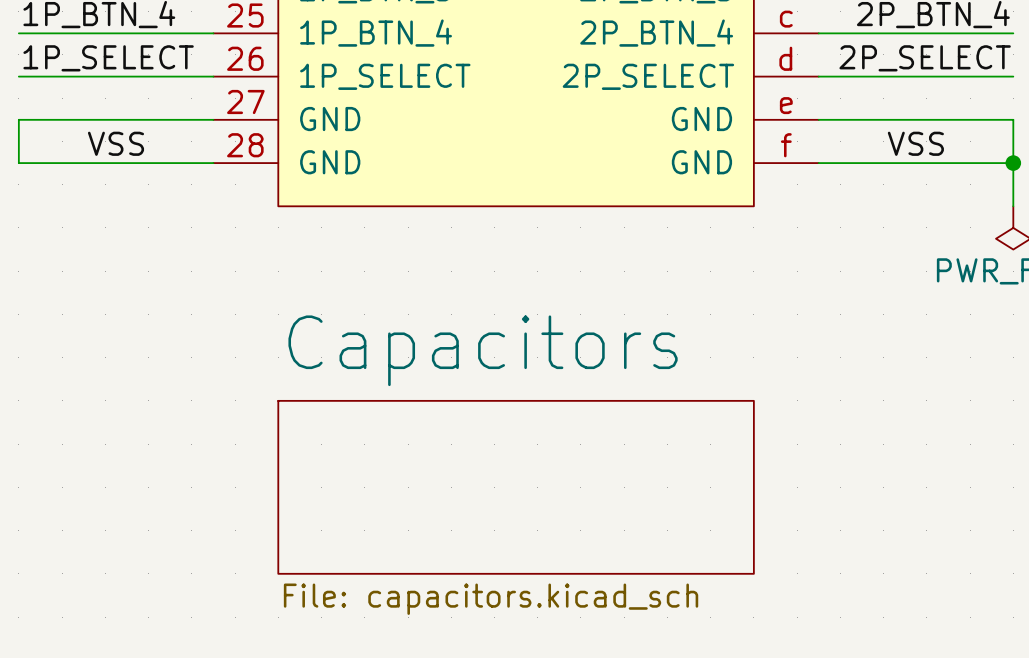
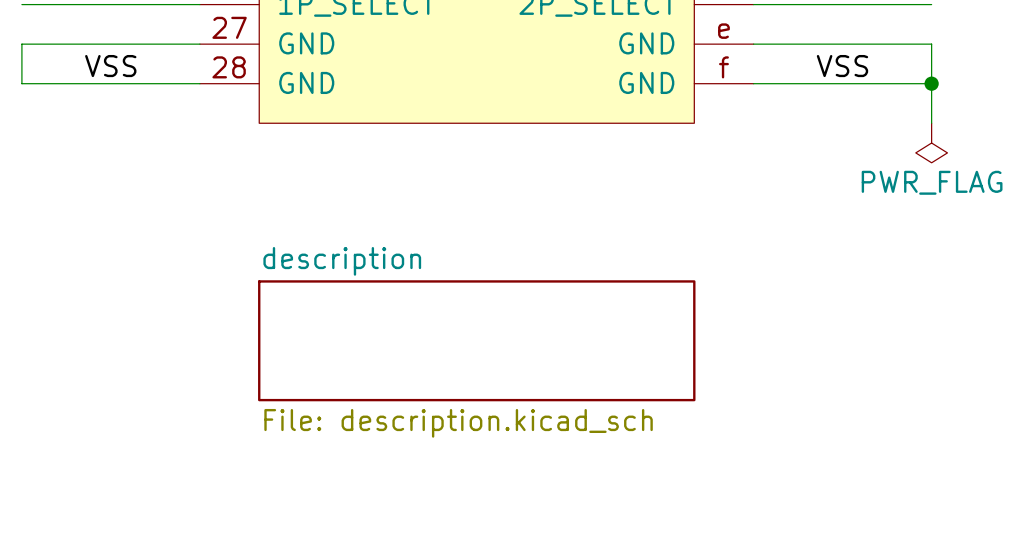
sheet description: none -> File: description.kicad_sch (476, 340)
sheet Capacitors: File: capacitors.kicad_sch (516, 487) -> none

